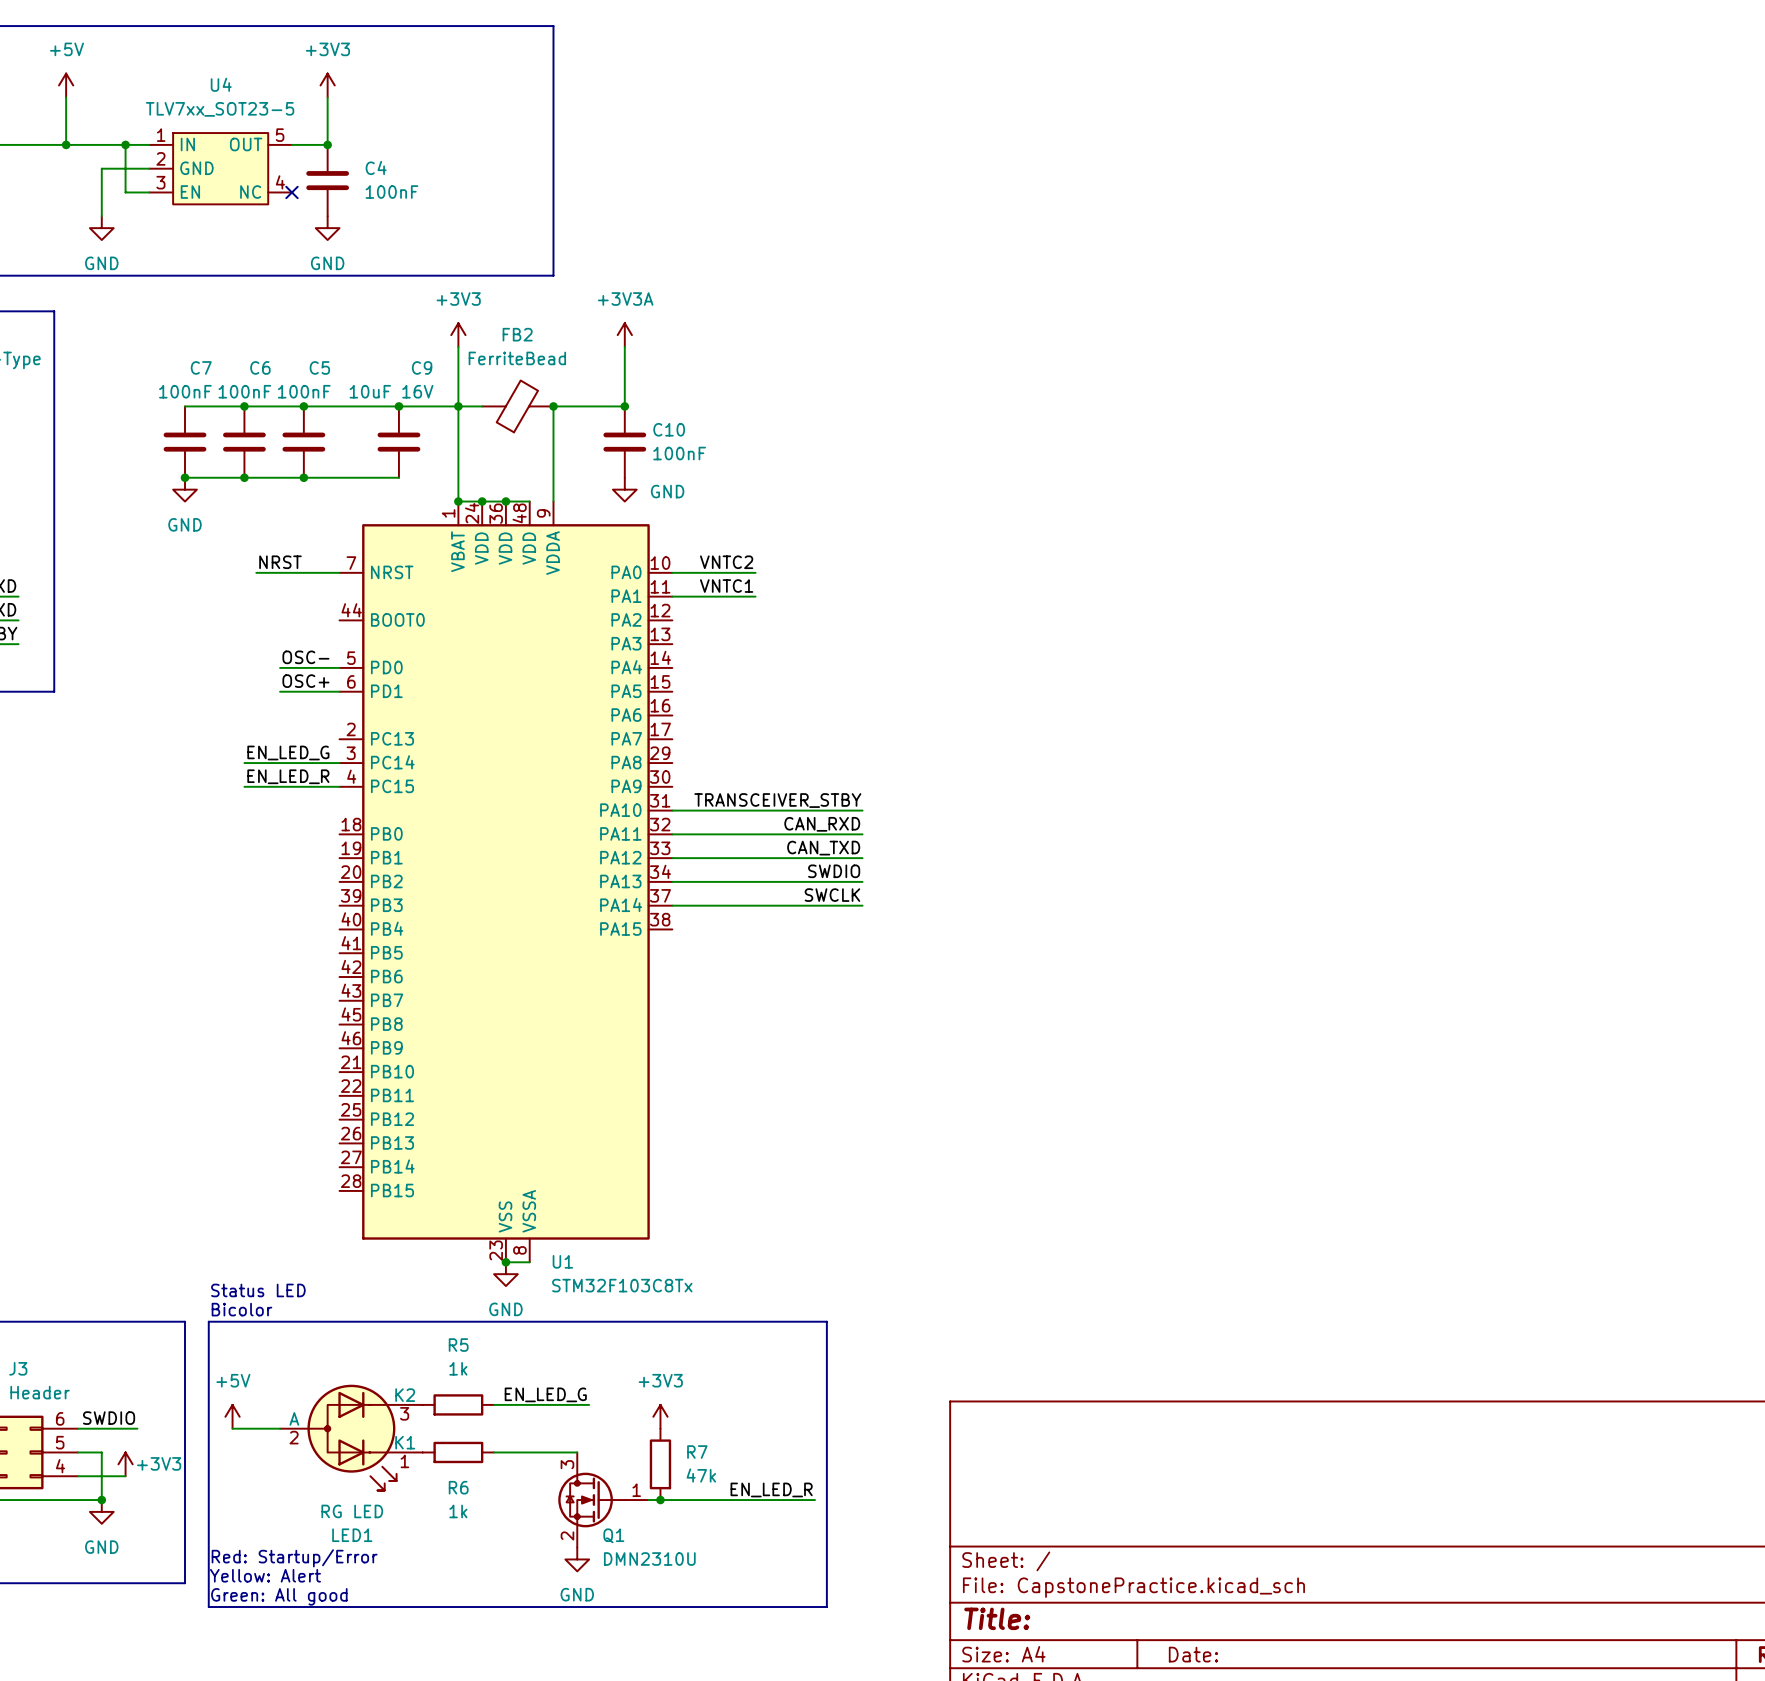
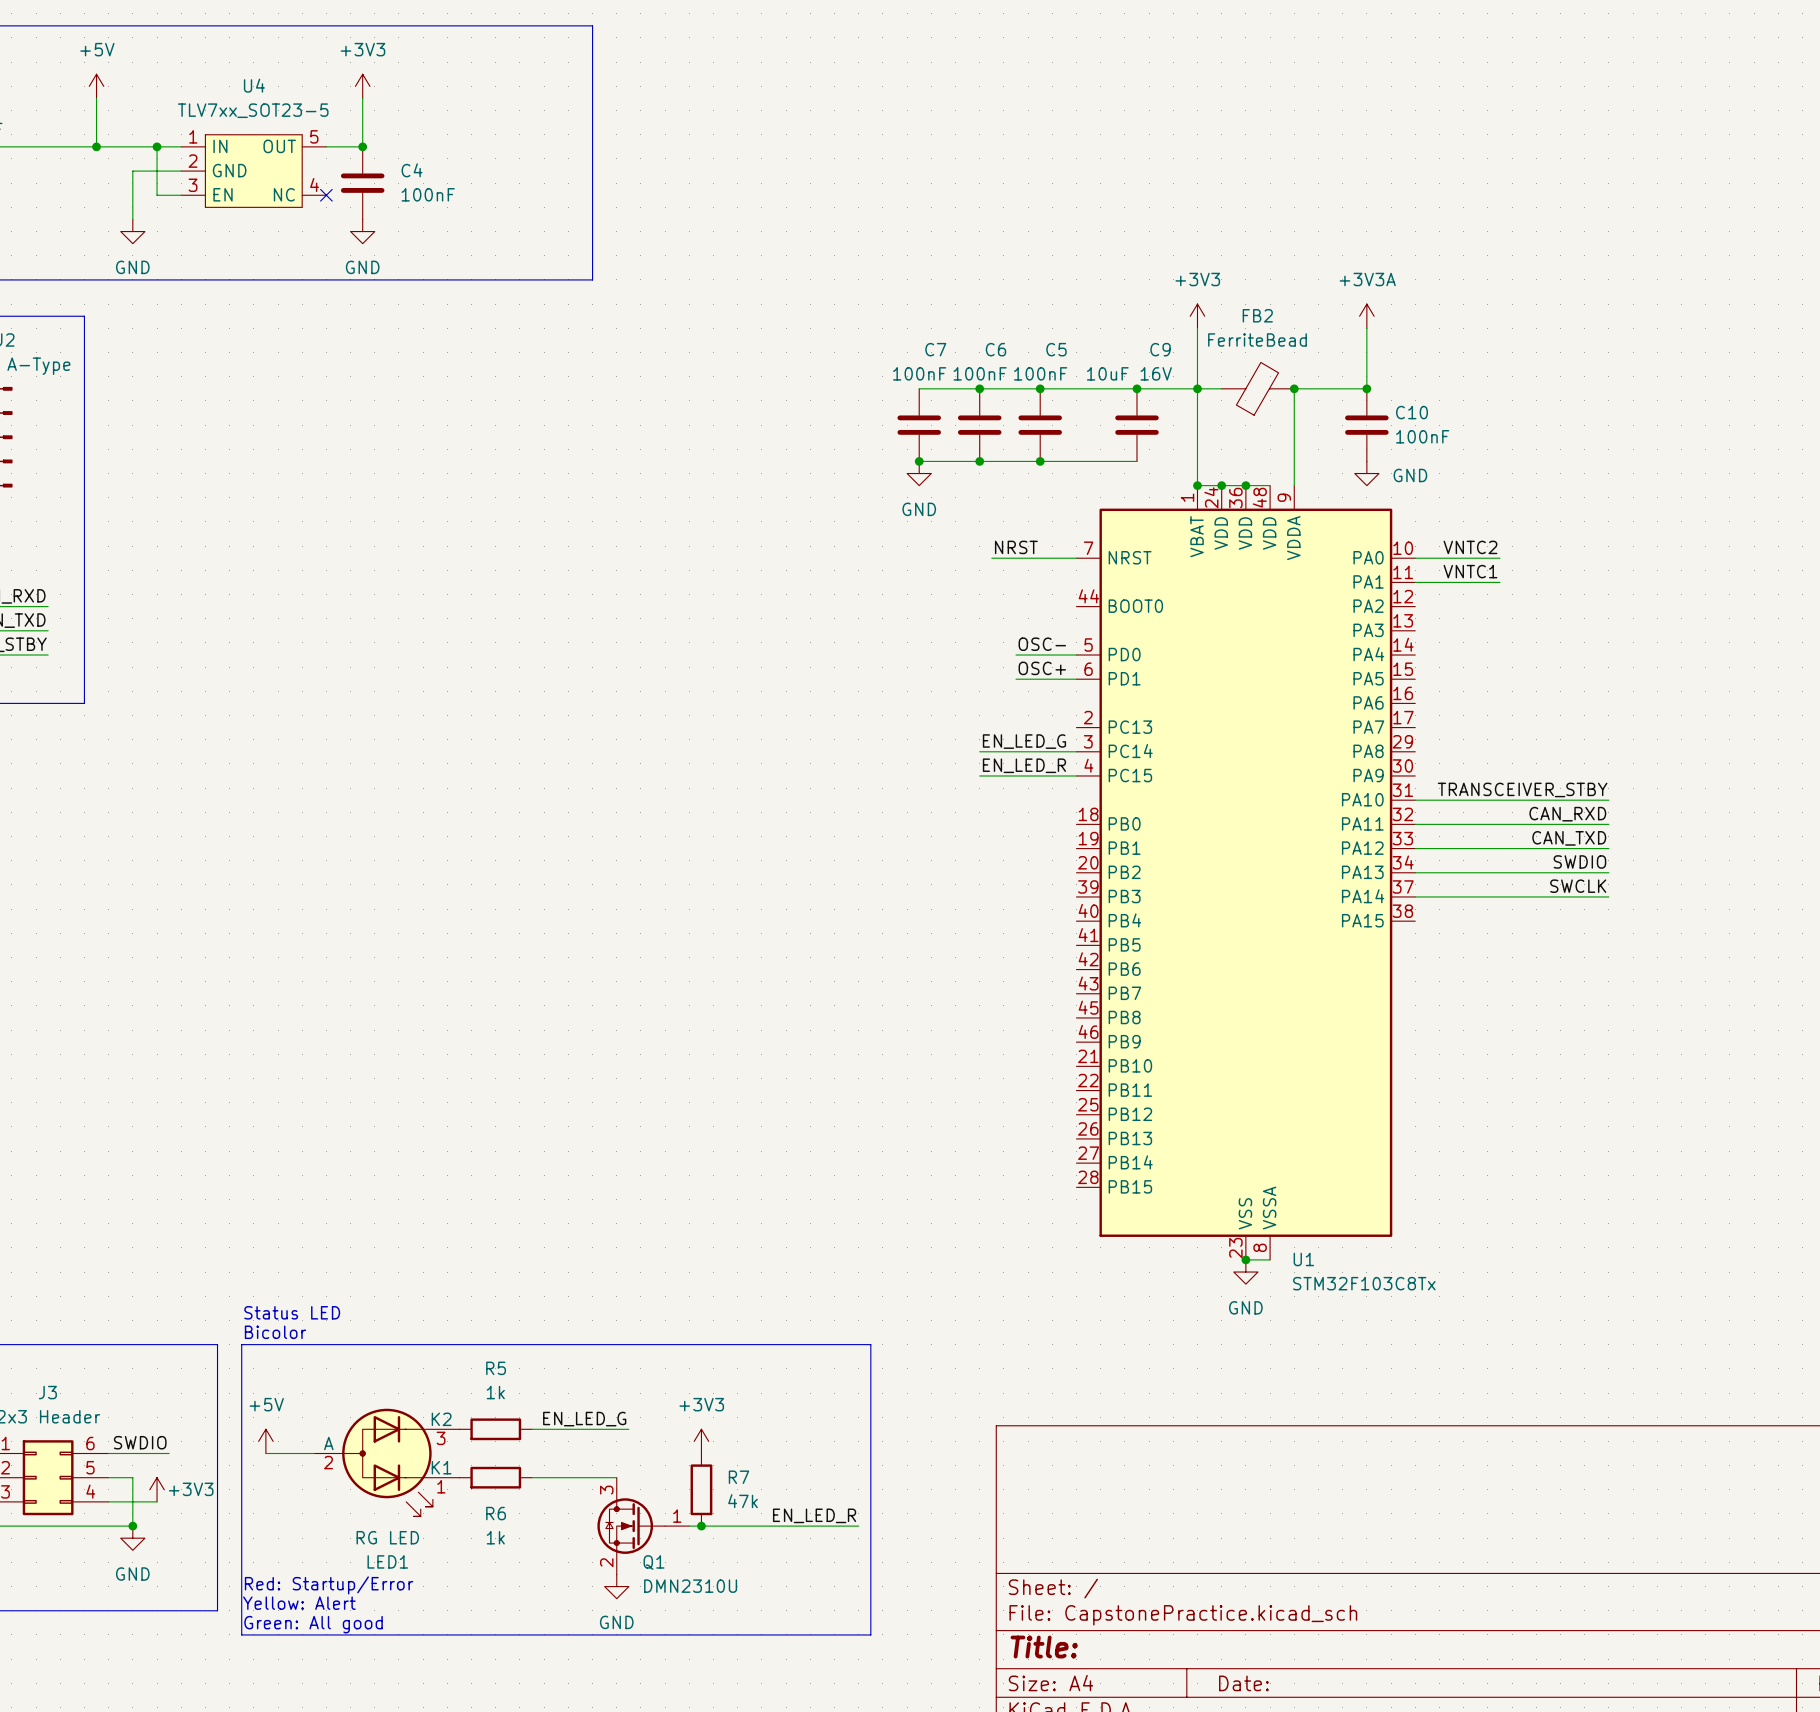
power symbol: none -> +3V3 (1197, 316)
power symbol: none -> +3V3A (1366, 316)
wire: none -> (1197, 328) (1197, 485) (1270, 485)
wire: none -> (1366, 328) (1366, 388) (1294, 388) (1294, 485)
power symbol: +3V3 (458, 335) -> none
power symbol: +3V3A (624, 335) -> none
wire: (458, 347) (458, 501) (529, 501) -> none
wire: (624, 347) (624, 406) (553, 406) (553, 501) -> none
wire: none -> (919, 388) (1221, 388)
junction: none -> (979, 388)
junction: none -> (1040, 388)
junction: none -> (1136, 388)
junction: none -> (1197, 388)
junction: none -> (1294, 388)
junction: none -> (1366, 388)
wire: (185, 406) (482, 406) -> none
junction: (244, 406) -> none
junction: (303, 406) -> none
junction: (398, 406) -> none
junction: (458, 406) -> none
FB2 position: (517, 406) -> (1257, 388)
junction: (553, 406) -> none
junction: (624, 406) -> none
C7 position: (185, 442) -> (919, 425)
C6 position: (244, 442) -> (979, 425)
C5 position: (303, 442) -> (1040, 425)
C9 position: (398, 442) -> (1136, 425)
C10 position: (624, 442) -> (1366, 425)
wire: none -> (919, 461) (1136, 461)
junction: none -> (919, 461)
junction: none -> (979, 461)
junction: none -> (1040, 461)
power symbol: none -> GND (919, 473)
power symbol: none -> GND (1366, 473)
wire: (185, 477) (398, 477) -> none
junction: (185, 477) -> none
junction: (244, 477) -> none
junction: (303, 477) -> none
junction: none -> (1197, 485)
junction: none -> (1221, 485)
junction: none -> (1245, 485)
power symbol: GND (185, 489) -> none
power symbol: GND (624, 489) -> none
junction: (458, 501) -> none
junction: (482, 501) -> none
junction: (505, 501) -> none
label: none -> NRST (1016, 547)
label: none -> VNTC2 (1470, 547)
wire: none -> (991, 558) (1076, 558)
wire: none -> (1415, 558) (1499, 558)
label: NRST (280, 562) -> none
label: VNTC2 (726, 562) -> none
label: none -> VNTC1 (1470, 571)
wire: (256, 572) (339, 572) -> none
wire: (672, 572) (755, 572) -> none
wire: none -> (1415, 582) (1499, 582)
label: VNTC1 (726, 586) -> none
wire: (672, 596) (755, 596) -> none
label: none -> OSC- (1042, 644)
wire: none -> (1016, 655) (1076, 655)
label: OSC- (305, 657) -> none
label: none -> OSC+ (1042, 668)
wire: (280, 667) (339, 667) -> none
wire: none -> (1016, 679) (1076, 679)
label: OSC+ (305, 681) -> none
wire: (280, 691) (339, 691) -> none
label: none -> EN_LED_G (1024, 741)
wire: none -> (979, 751) (1076, 751)
label: EN_LED_G (288, 753) -> none
label: none -> EN_LED_R (1024, 765)
wire: (244, 763) (339, 763) -> none
wire: none -> (979, 775) (1076, 775)
label: EN_LED_R (288, 776) -> none
label: none -> TRANSCEIVER_STBY (1522, 789)
wire: (244, 786) (339, 786) -> none
wire: none -> (1415, 800) (1608, 800)
label: TRANSCEIVER_STBY (777, 800) -> none
label: none -> CAN_RXD (1567, 814)
wire: (672, 810) (862, 810) -> none
wire: none -> (1415, 824) (1608, 824)
label: CAN_RXD (822, 824) -> none
label: none -> CAN_TXD (1569, 838)
wire: (672, 834) (862, 834) -> none
wire: none -> (1415, 848) (1608, 848)
label: none -> SWDIO (1579, 861)
label: CAN_TXD (823, 848) -> none
wire: (672, 858) (862, 858) -> none
wire: none -> (1415, 872) (1608, 872)
label: SWDIO (834, 871) -> none
label: none -> SWCLK (1578, 886)
U1 position: (505, 881) -> (1245, 872)
wire: (672, 881) (862, 881) -> none
wire: none -> (1415, 896) (1608, 896)
label: SWCLK (832, 895) -> none
wire: (672, 905) (862, 905) -> none
wire: none -> (1245, 1259) (1270, 1259)
junction: none -> (1245, 1259)
power symbol: none -> GND (1245, 1272)
wire: (505, 1262) (529, 1262) -> none
junction: (505, 1262) -> none
power symbol: GND (505, 1274) -> none

